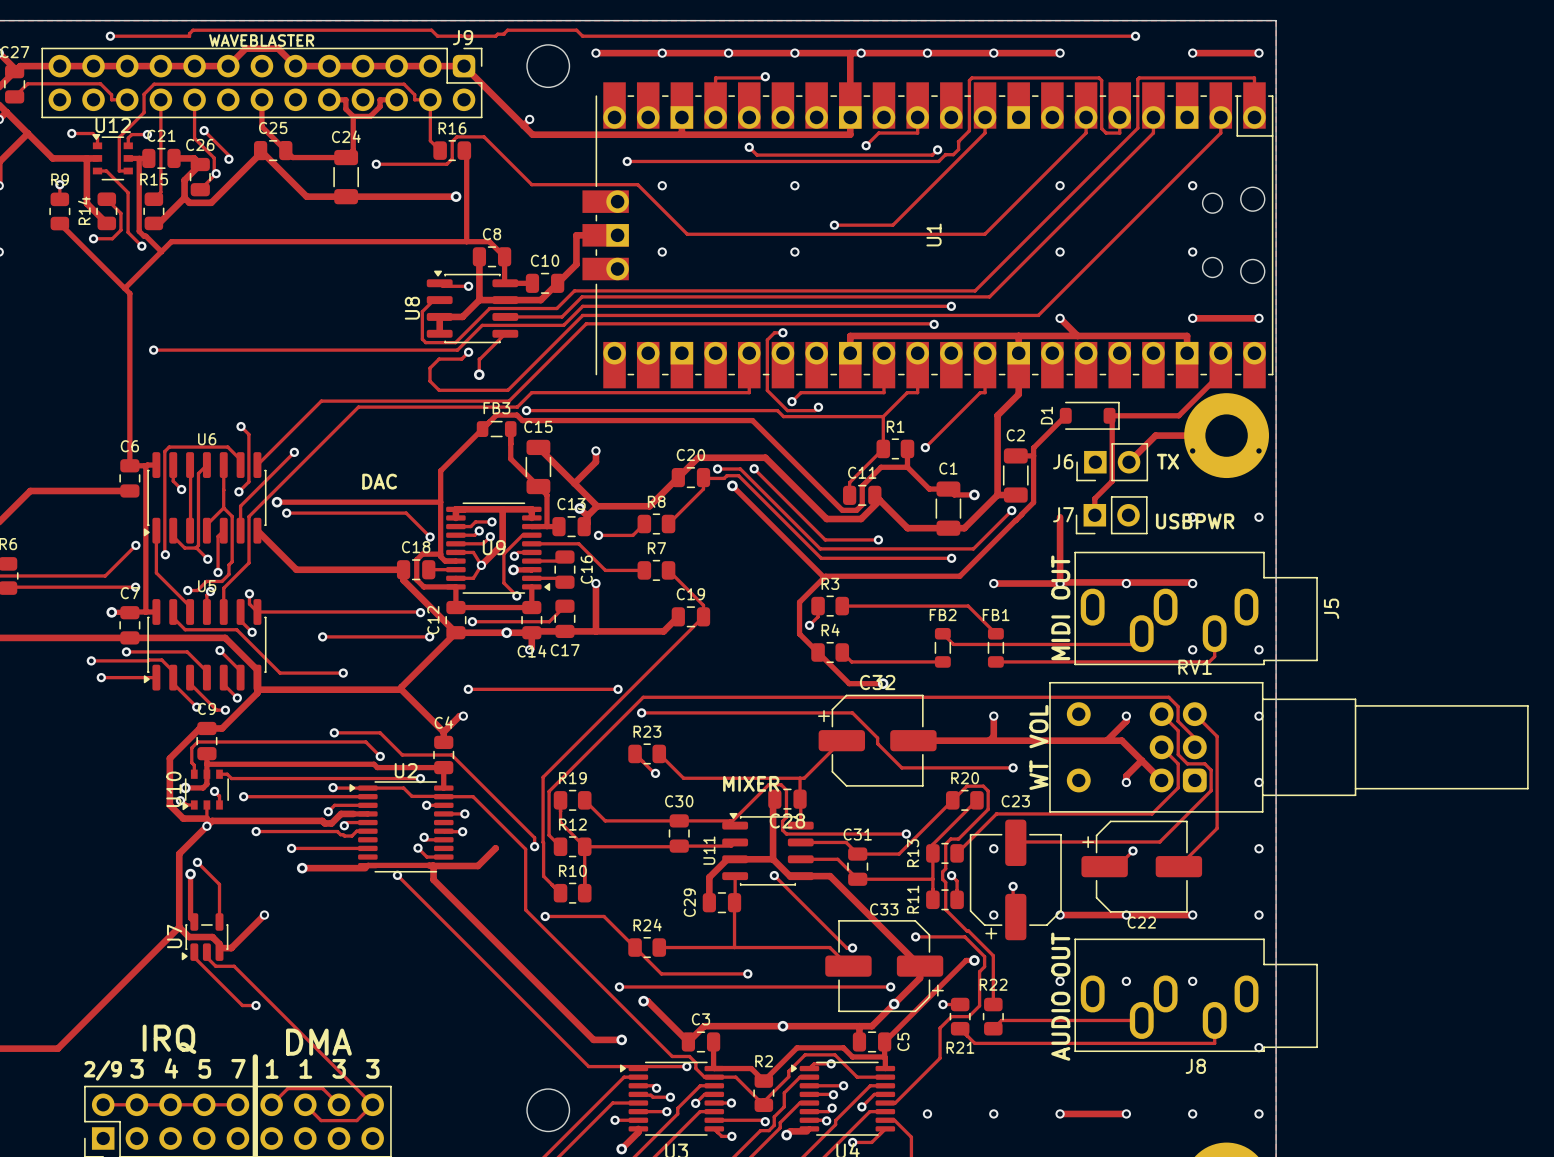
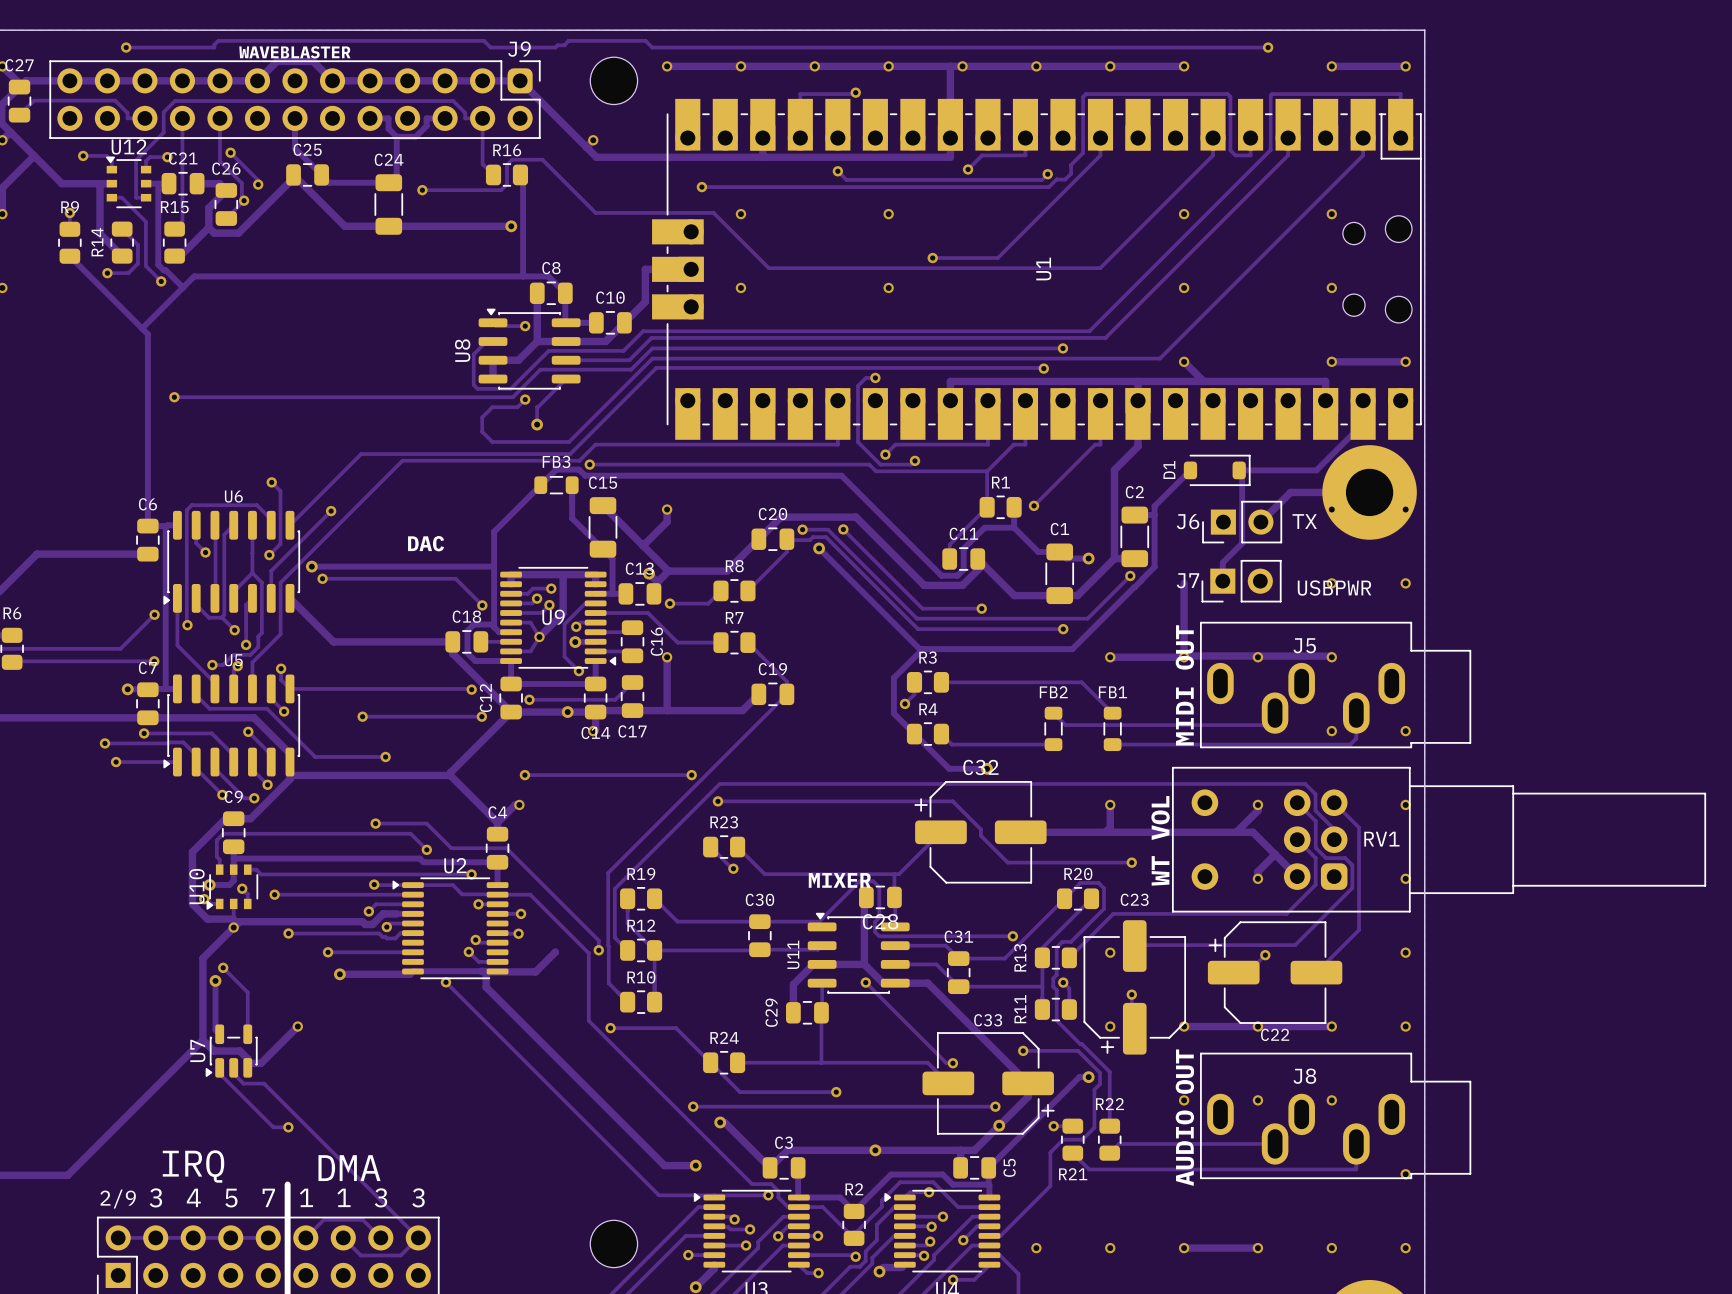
J5 name rotation: 0° (1331, 608) -> 90° clockwise (1304, 645)
J5 name position: J5 (1331, 608) -> J5 (1304, 645)
RV1 name position: RV1 (1195, 667) -> RV1 (1381, 839)
J8 name position: J8 (1195, 1066) -> J8 (1304, 1076)

